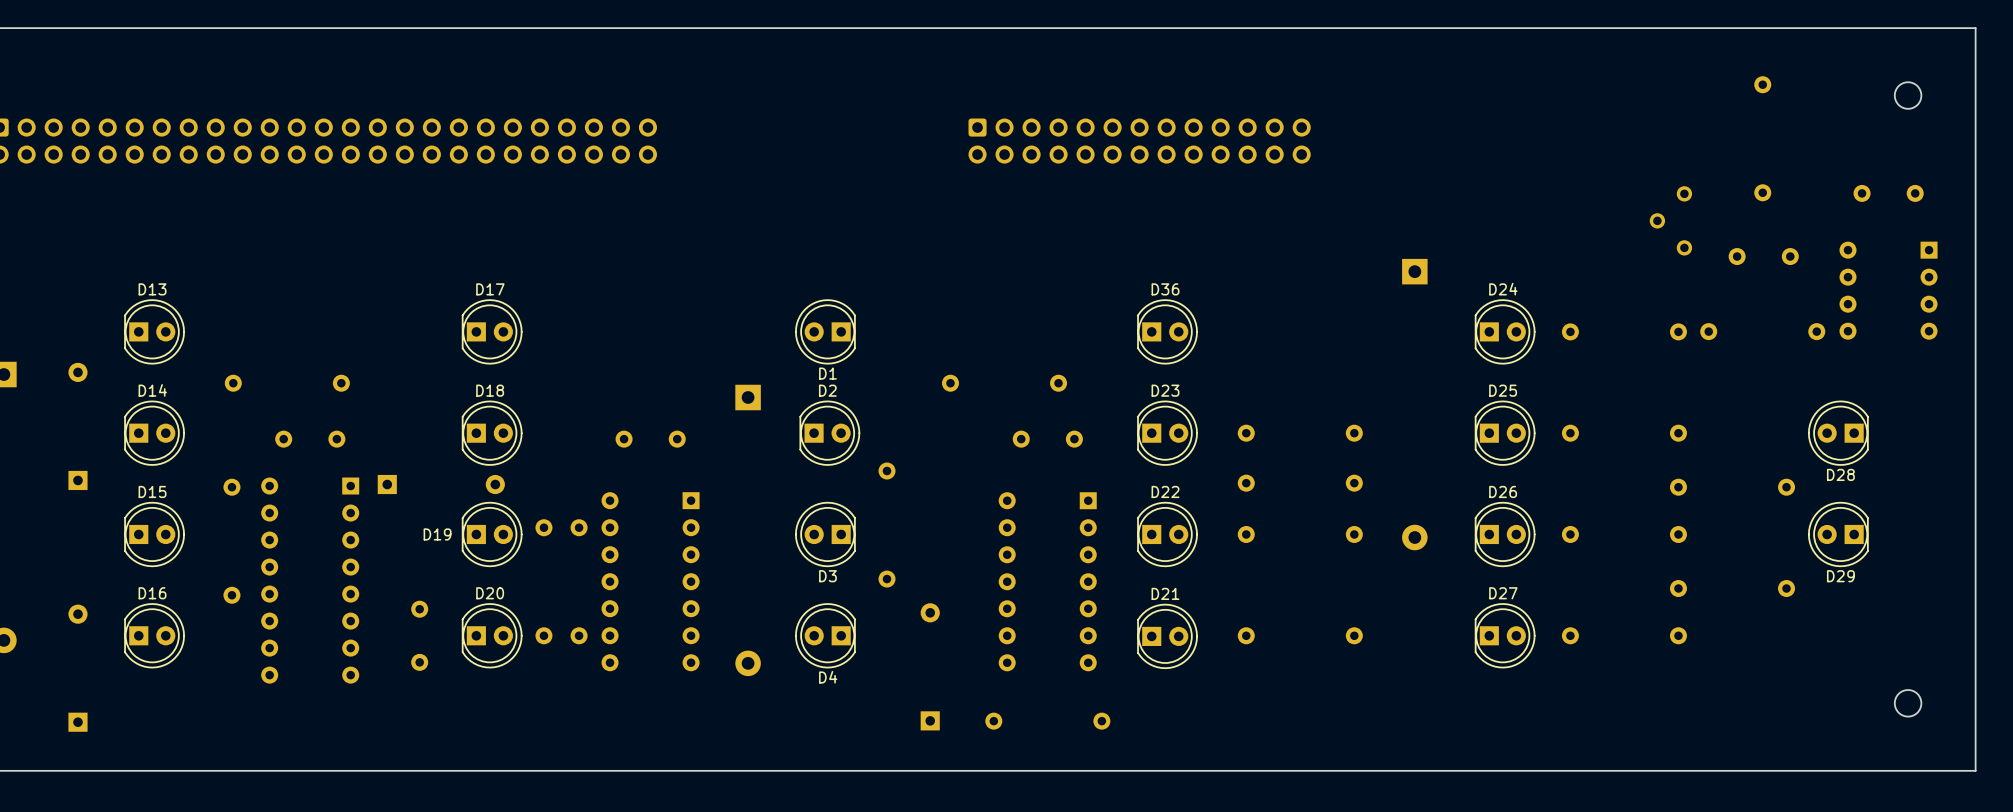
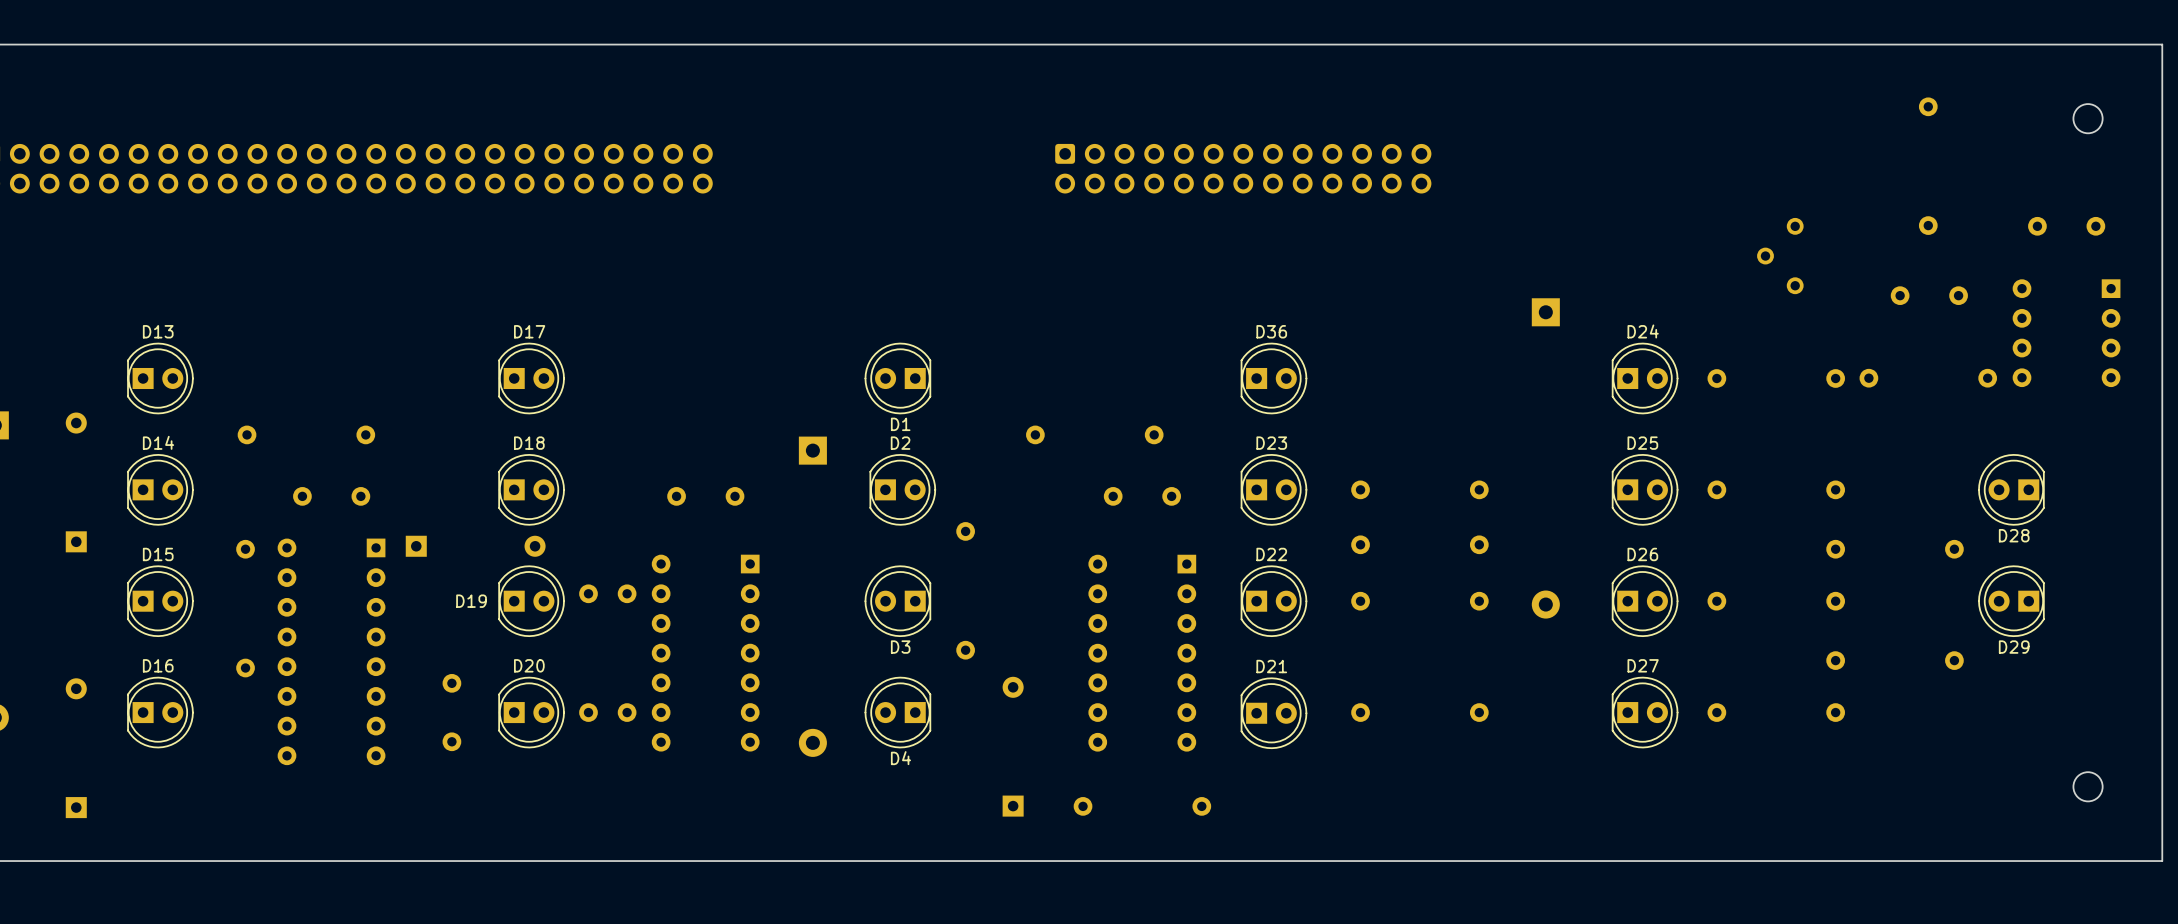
part position: (1670, 220) -> (1780, 256)

